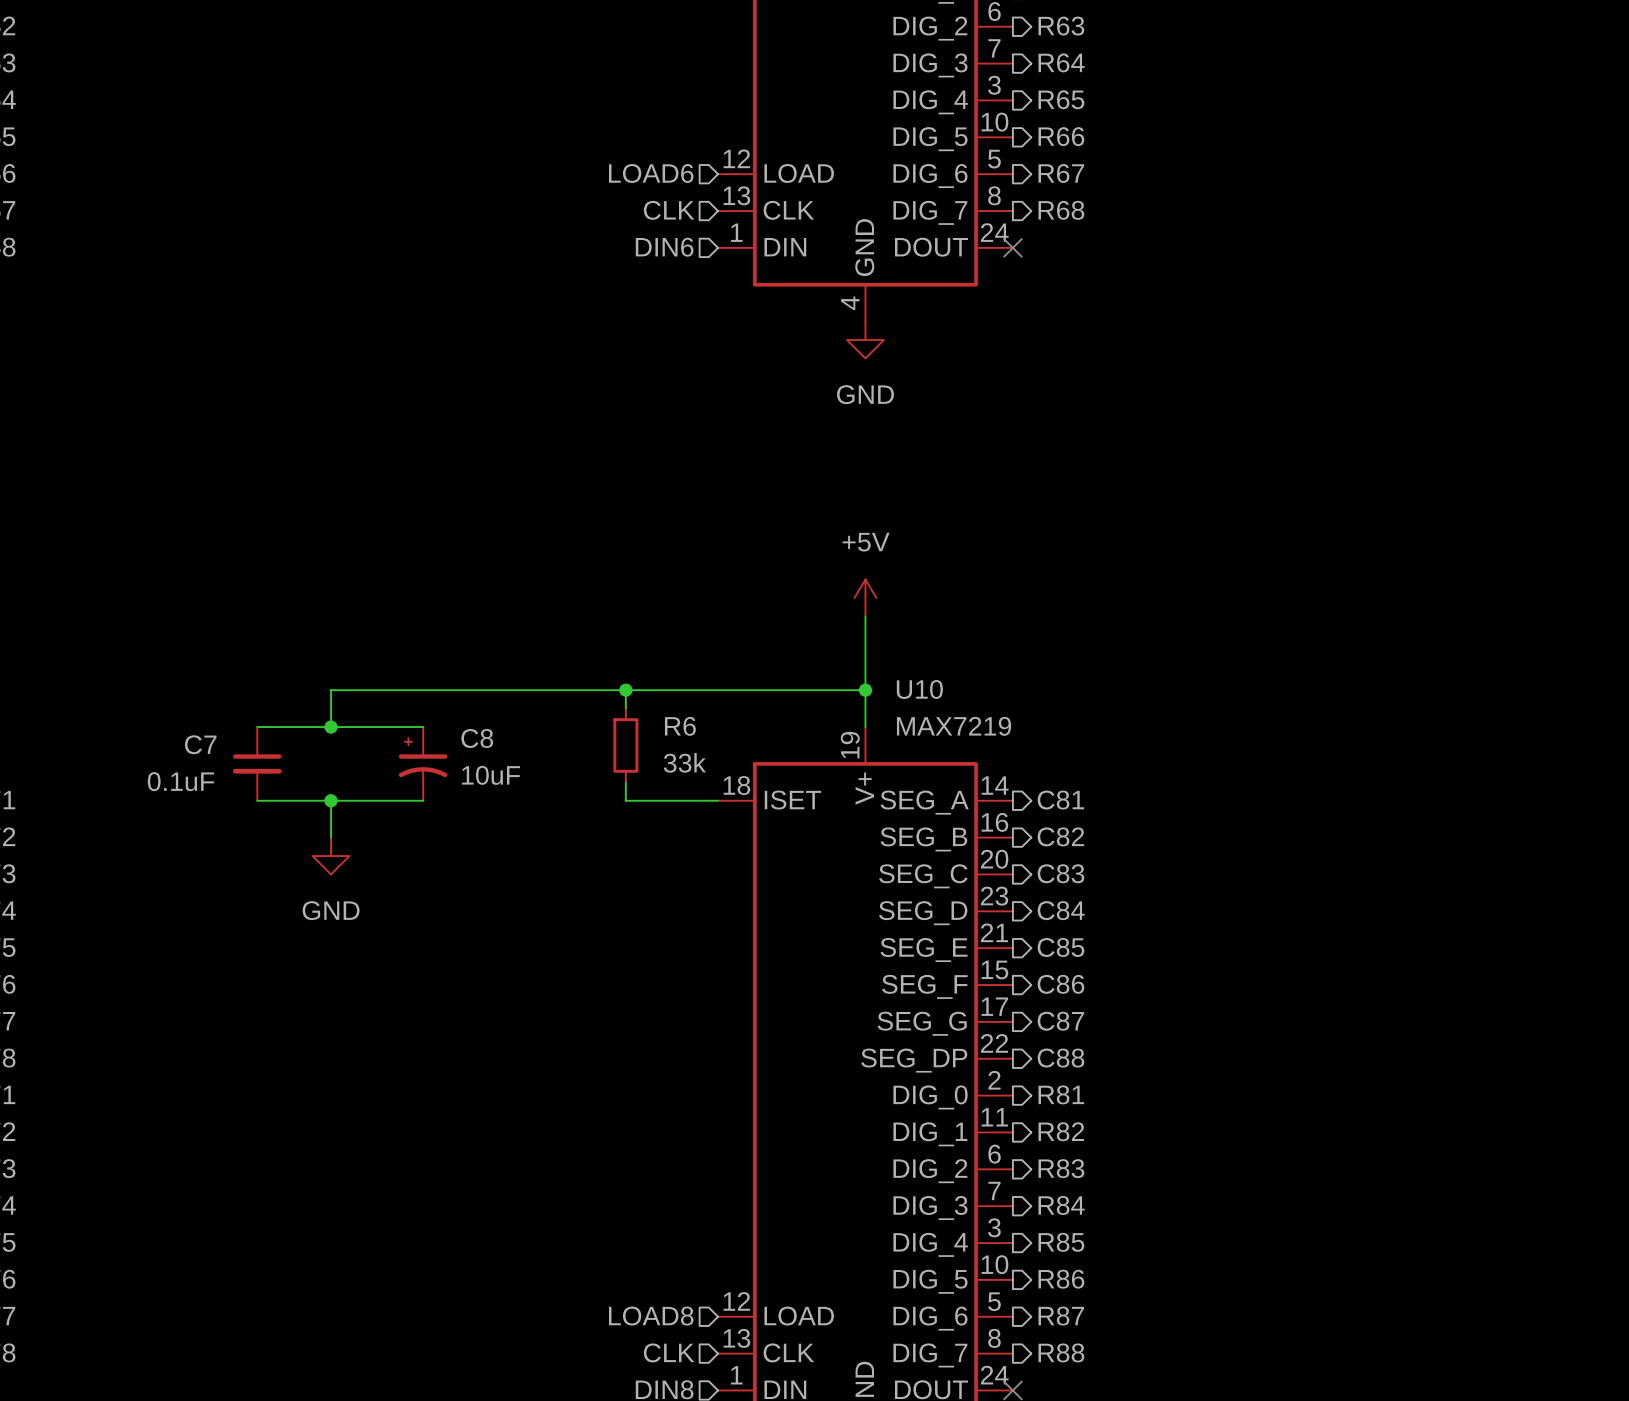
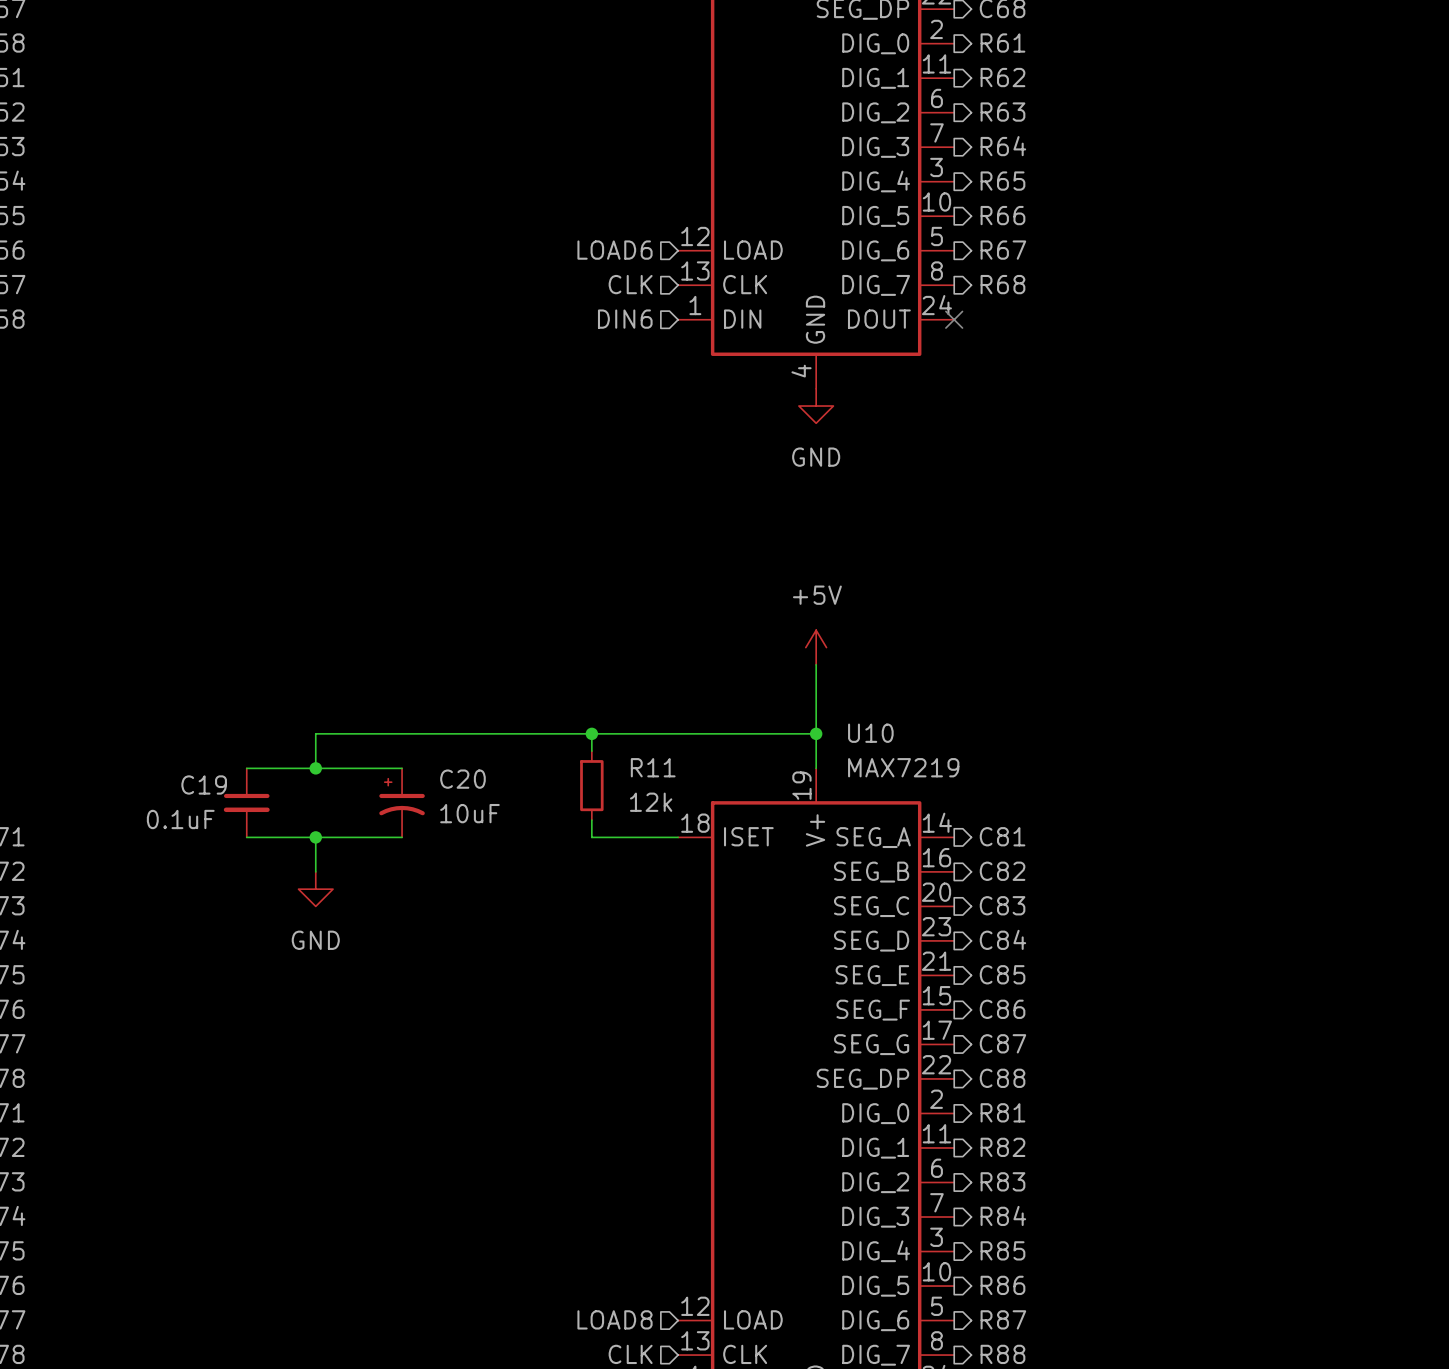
R6 name: R6 (680, 726) -> R11 (653, 767)
C8 name: C8 (477, 738) -> C20 (462, 779)
C7 name: C7 (200, 744) -> C19 (204, 784)
R6 value: 33k (684, 762) -> 12k (651, 802)

